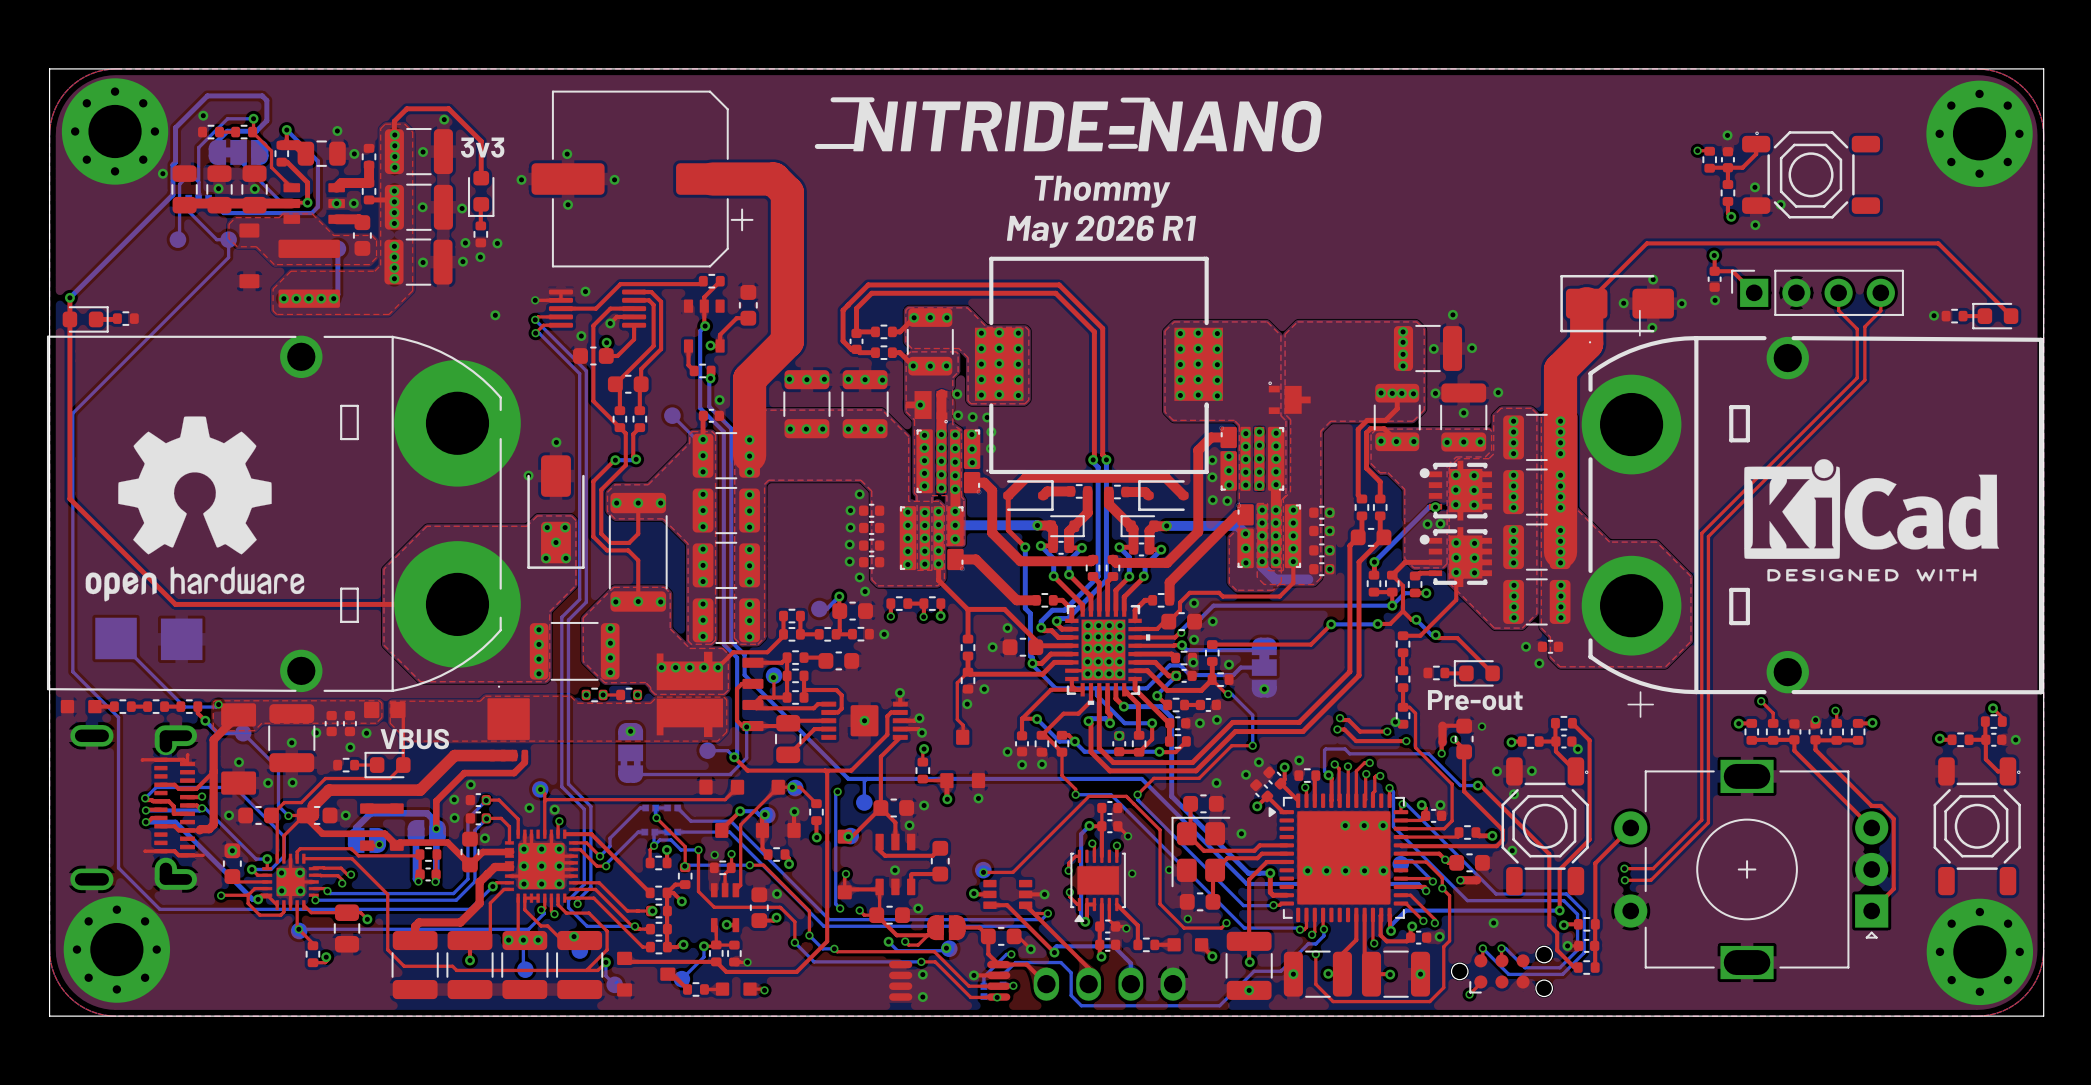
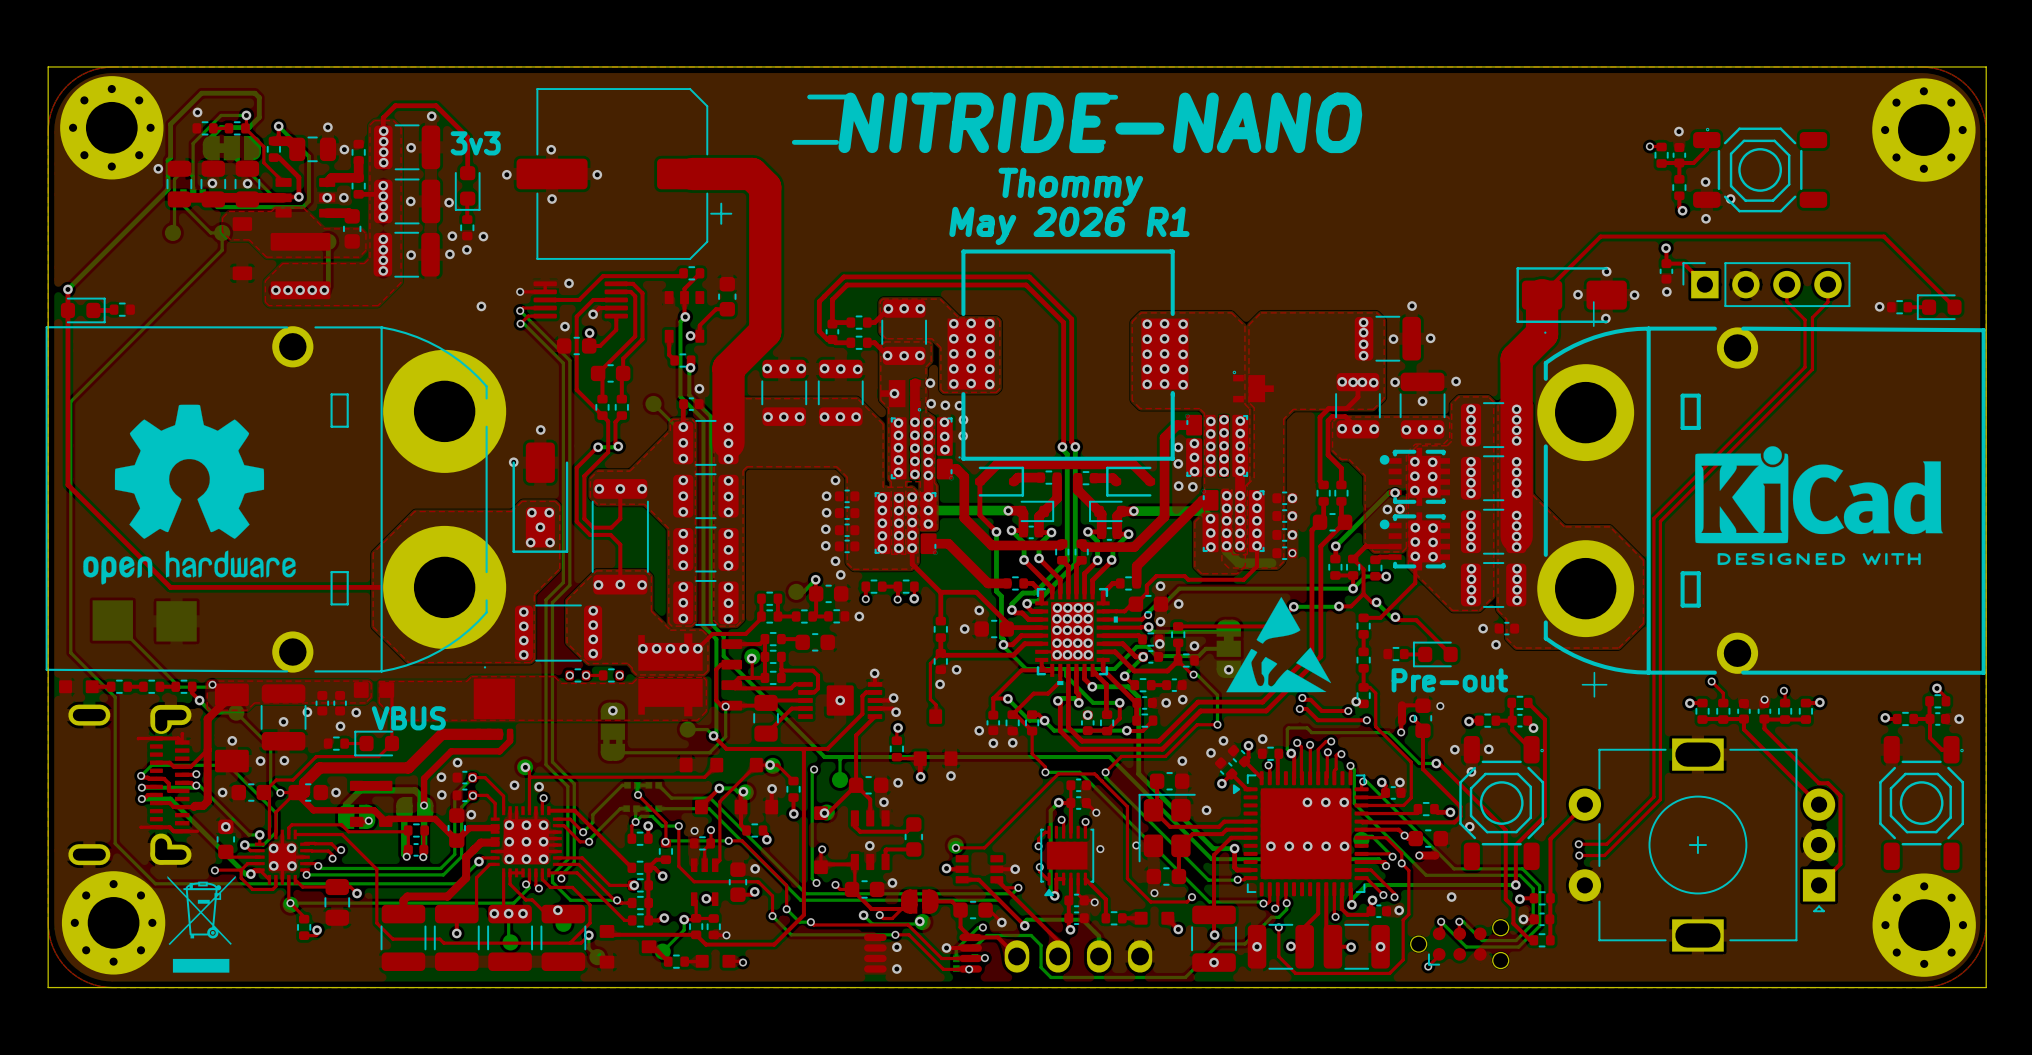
drawing: none -> [1226, 597, 1332, 693]
drawing: none -> [167, 875, 236, 973]

